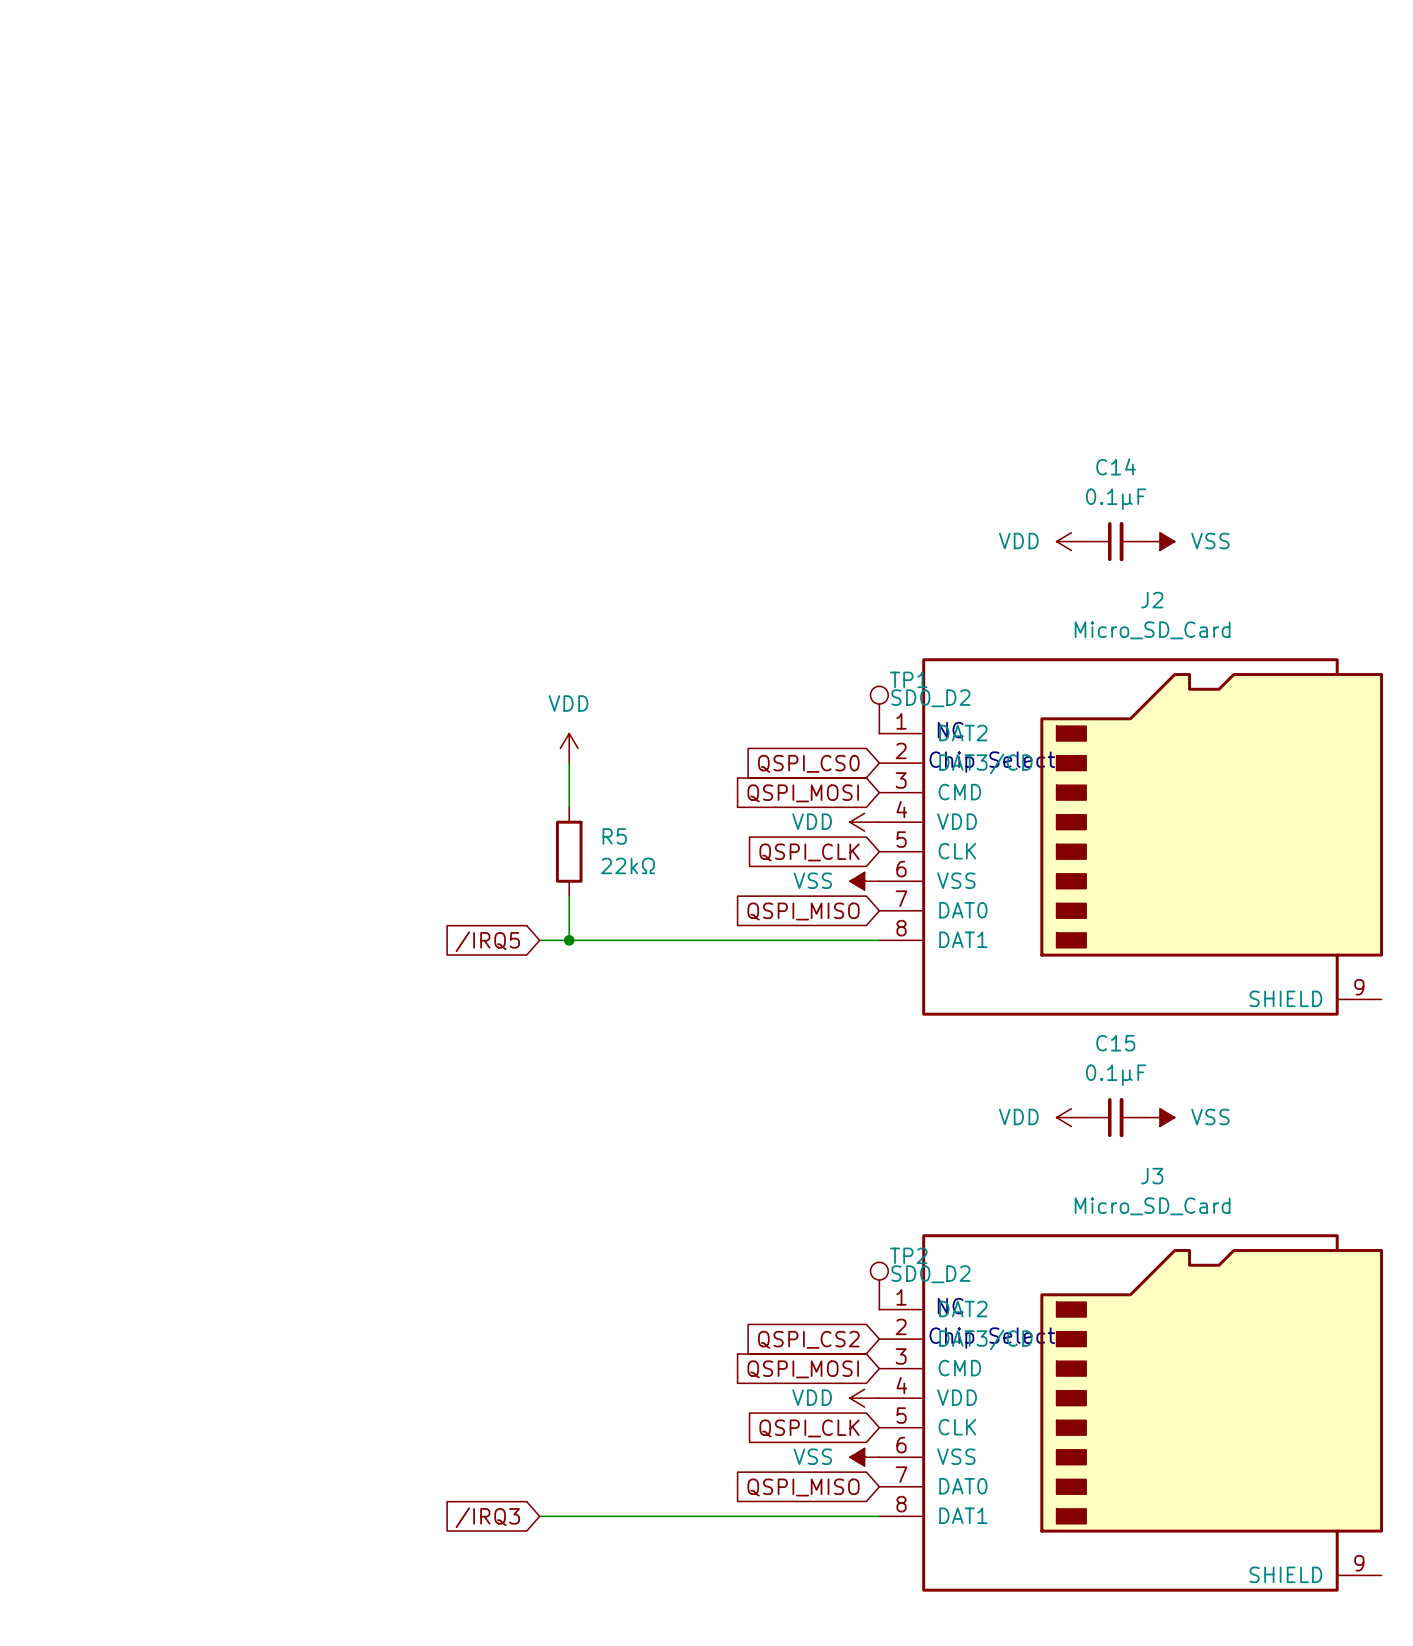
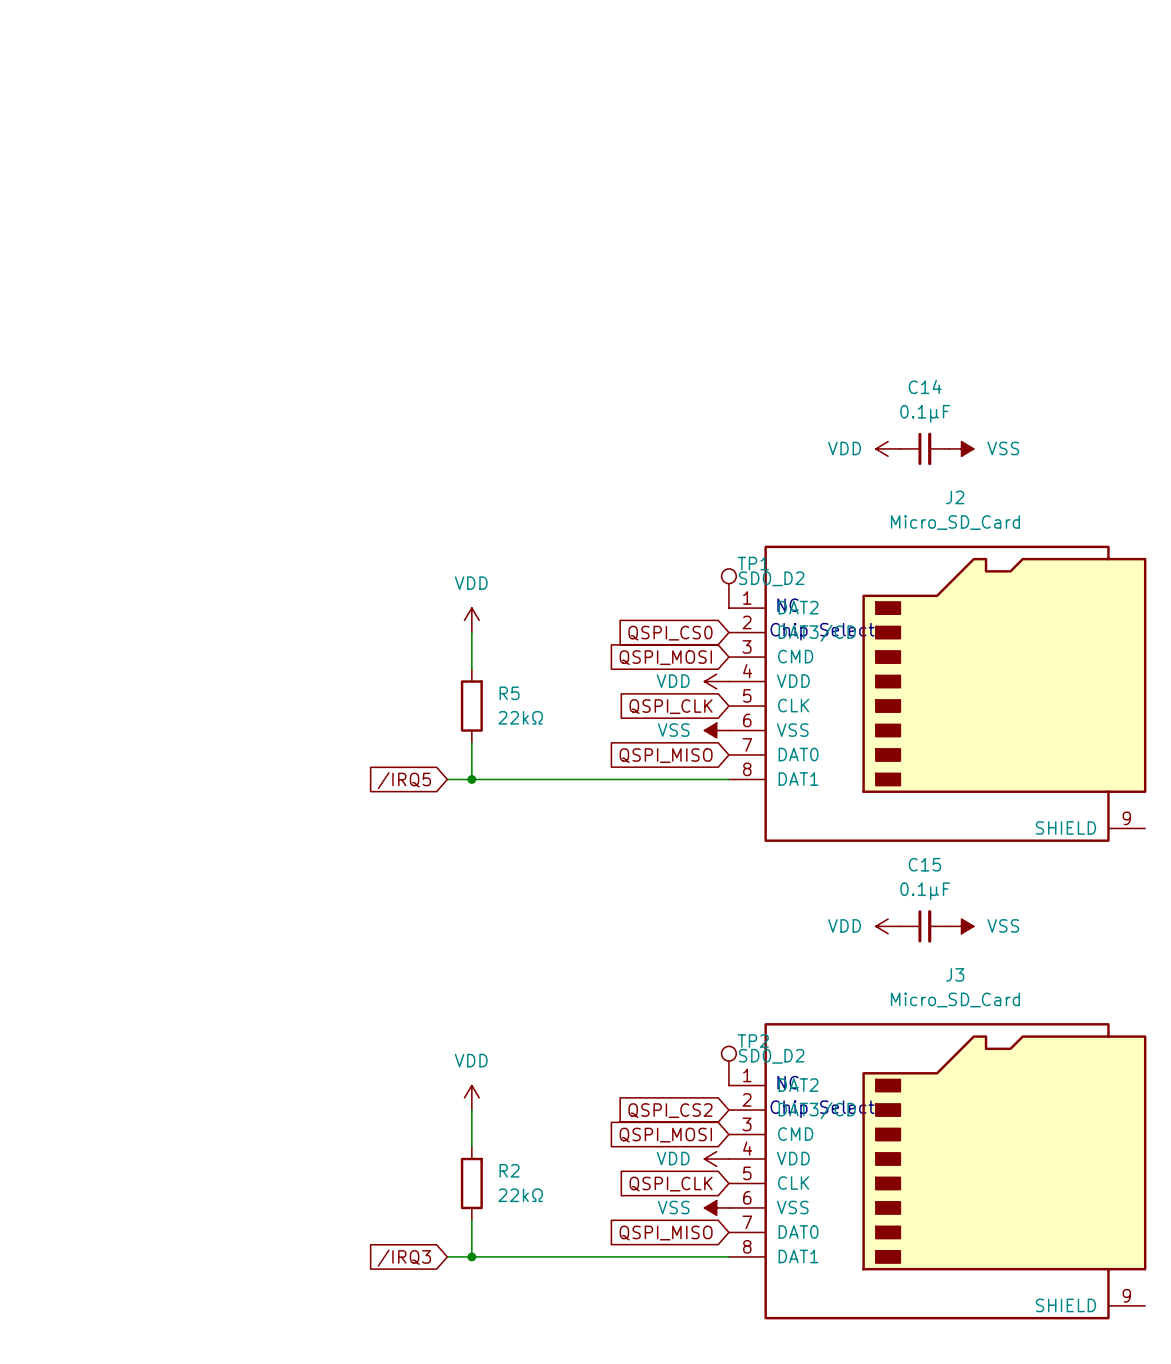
power symbol: none -> VDD (471, 1097)
wire: none -> (471, 1110) (471, 1146)
R2: none -> 22kΩ (471, 1183)
wire: none -> (471, 1220) (471, 1256)
junction: none -> (471, 1256)

